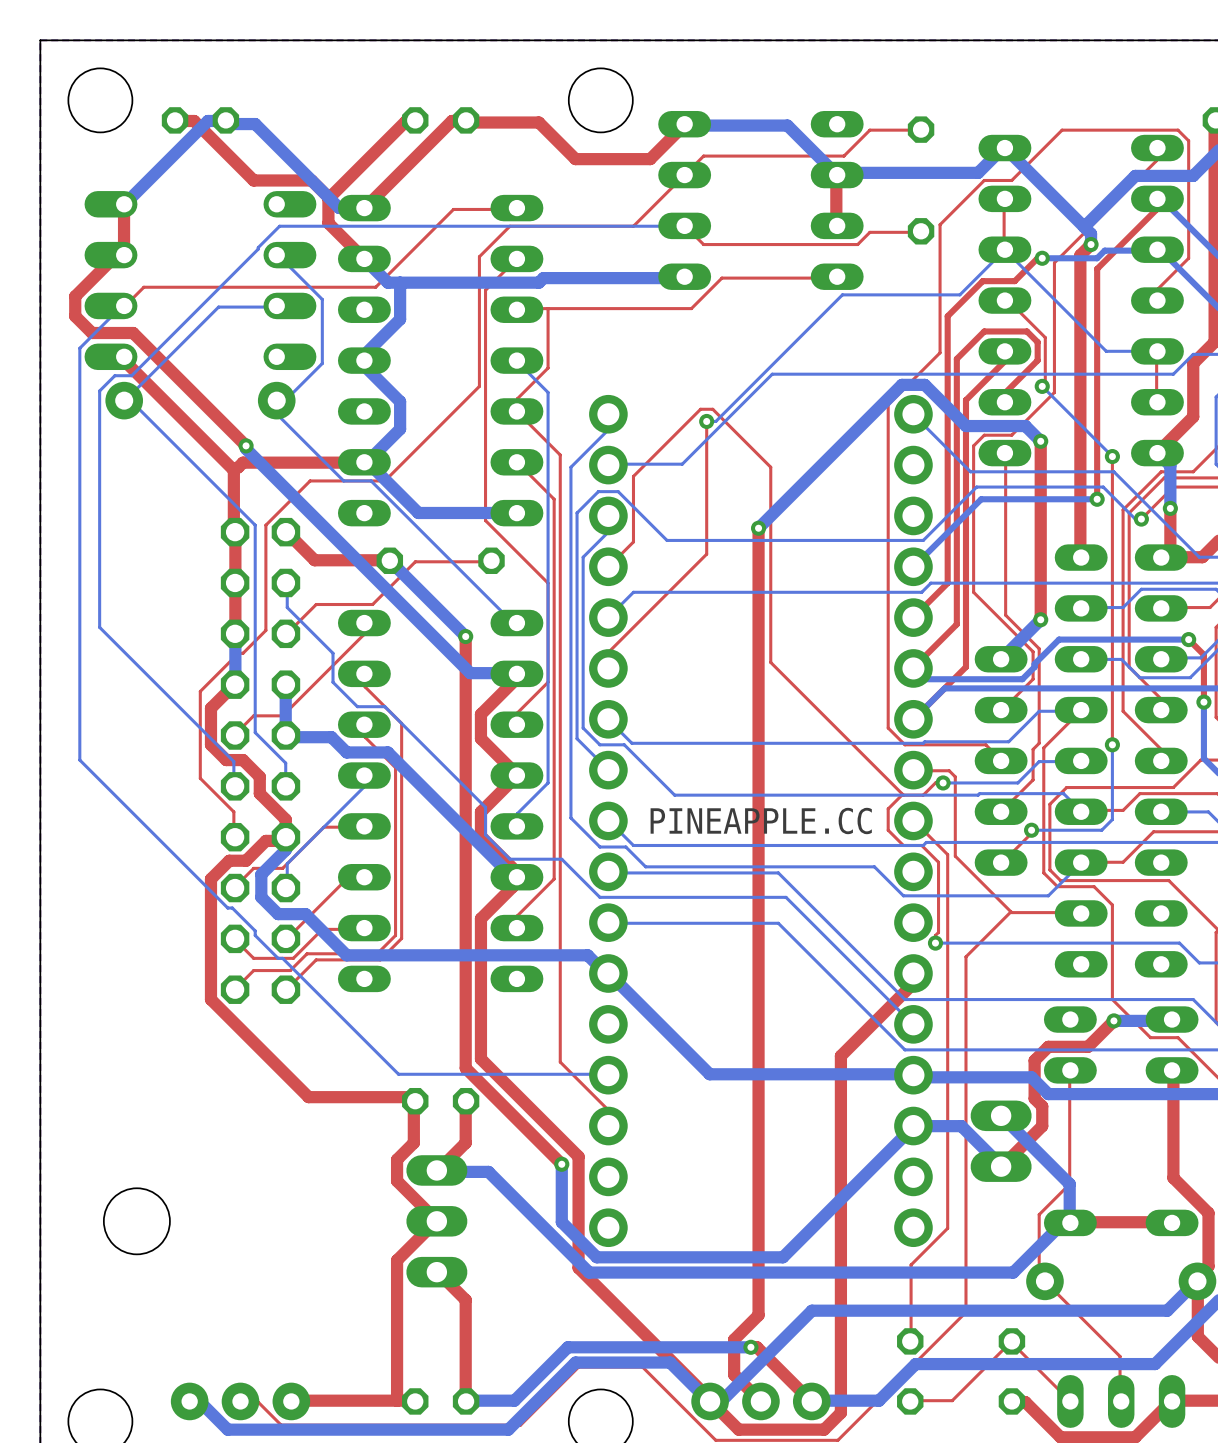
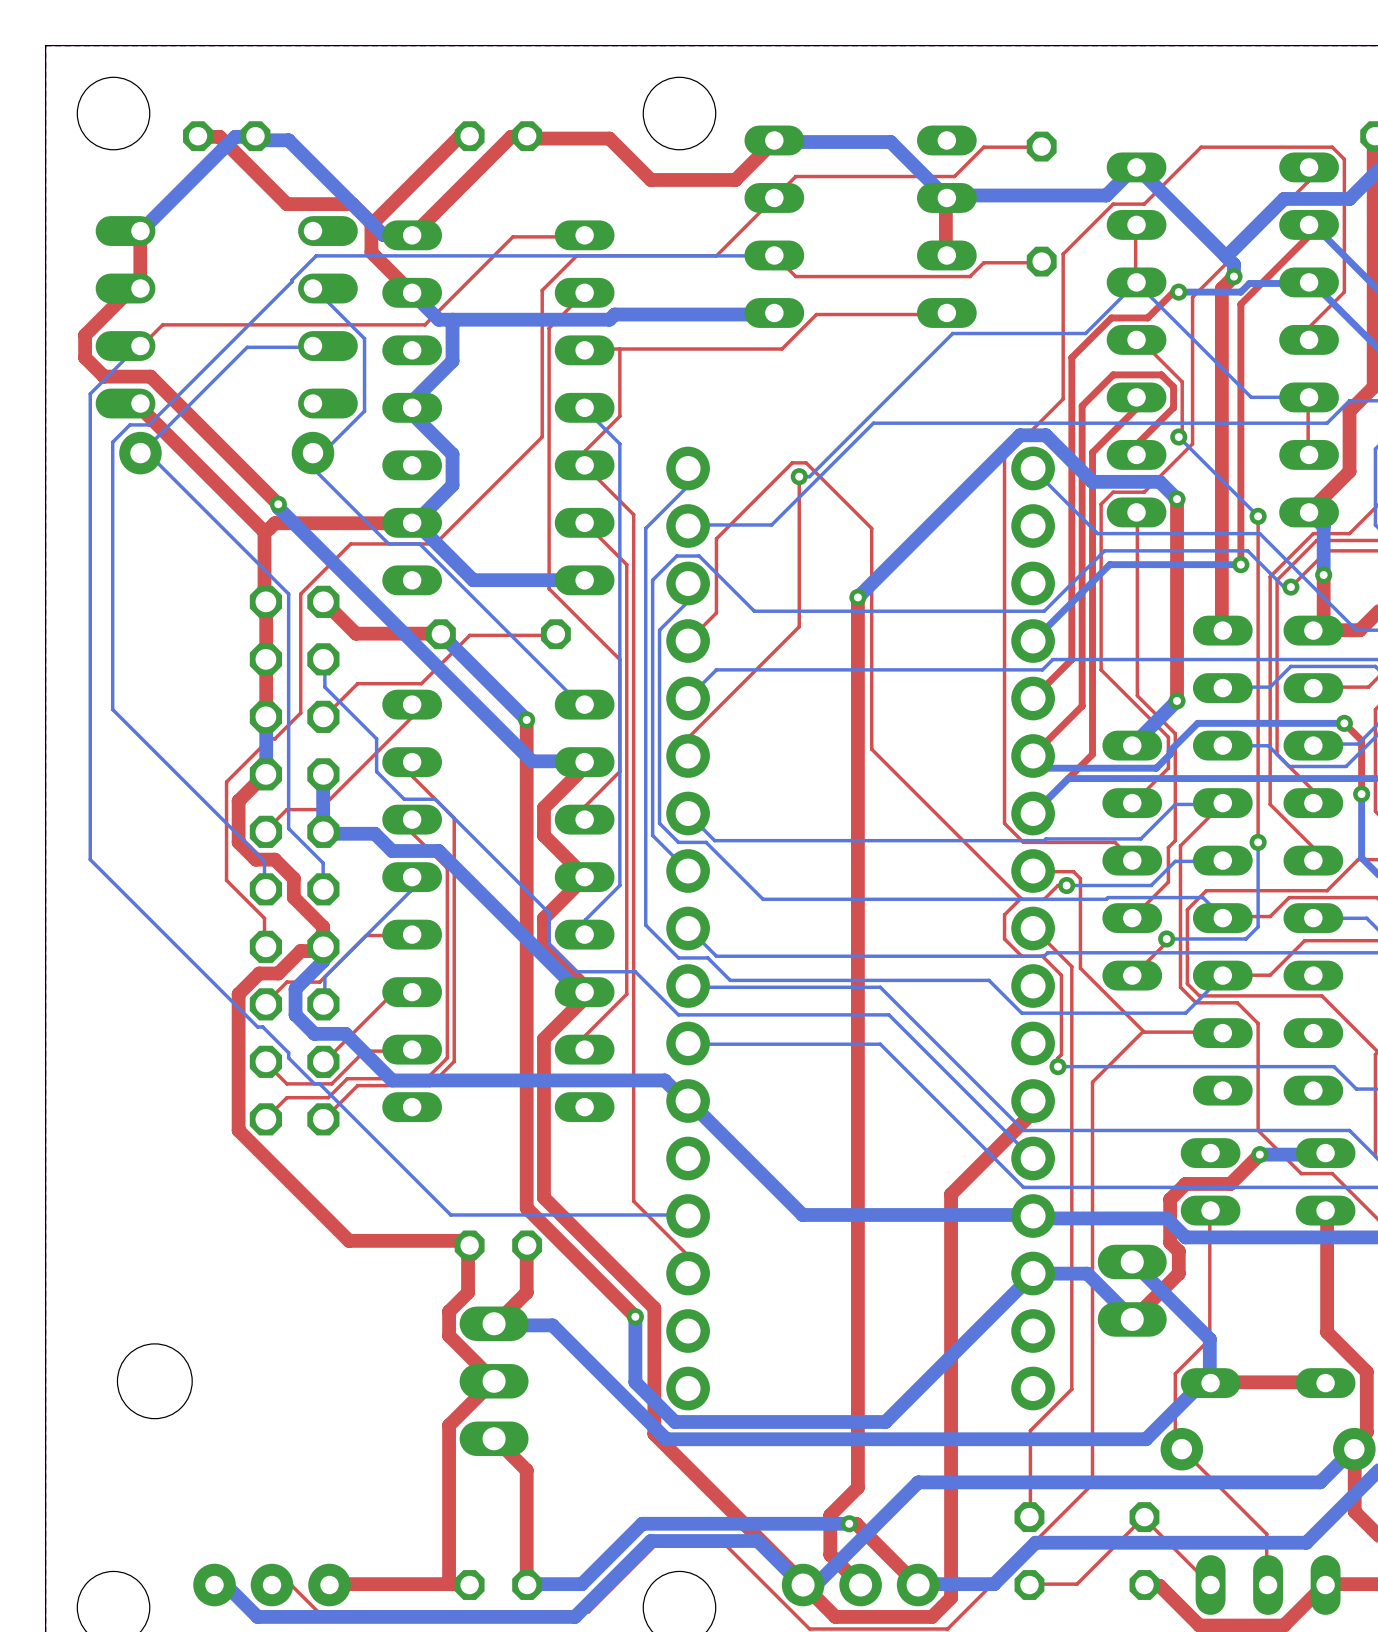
text: PINEAPPLE.CC (761, 821) -> none

